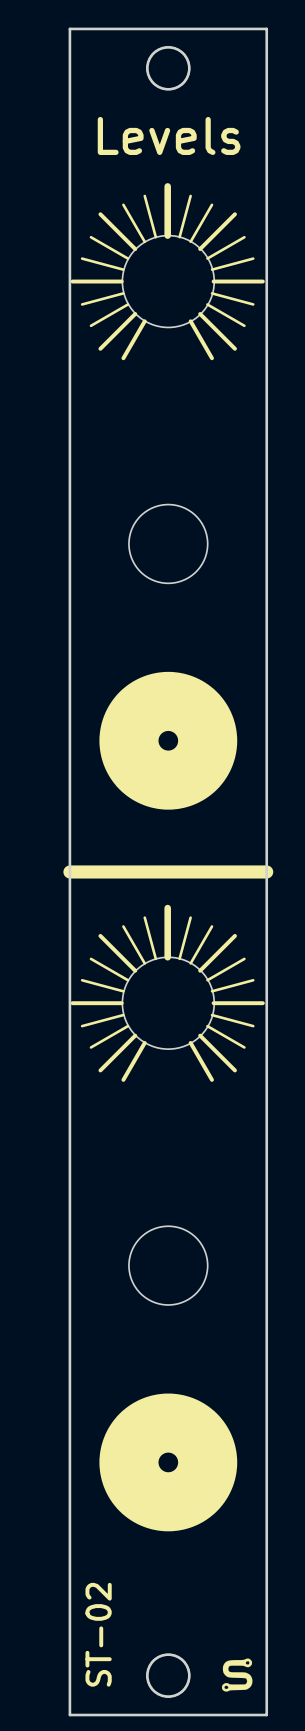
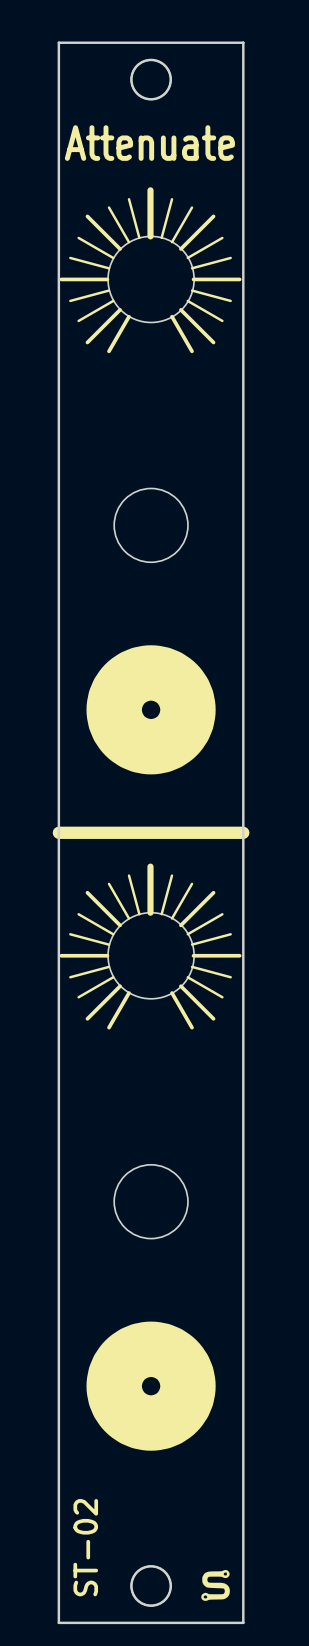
text: Levels (169, 135) -> Attenuate (149, 143)

